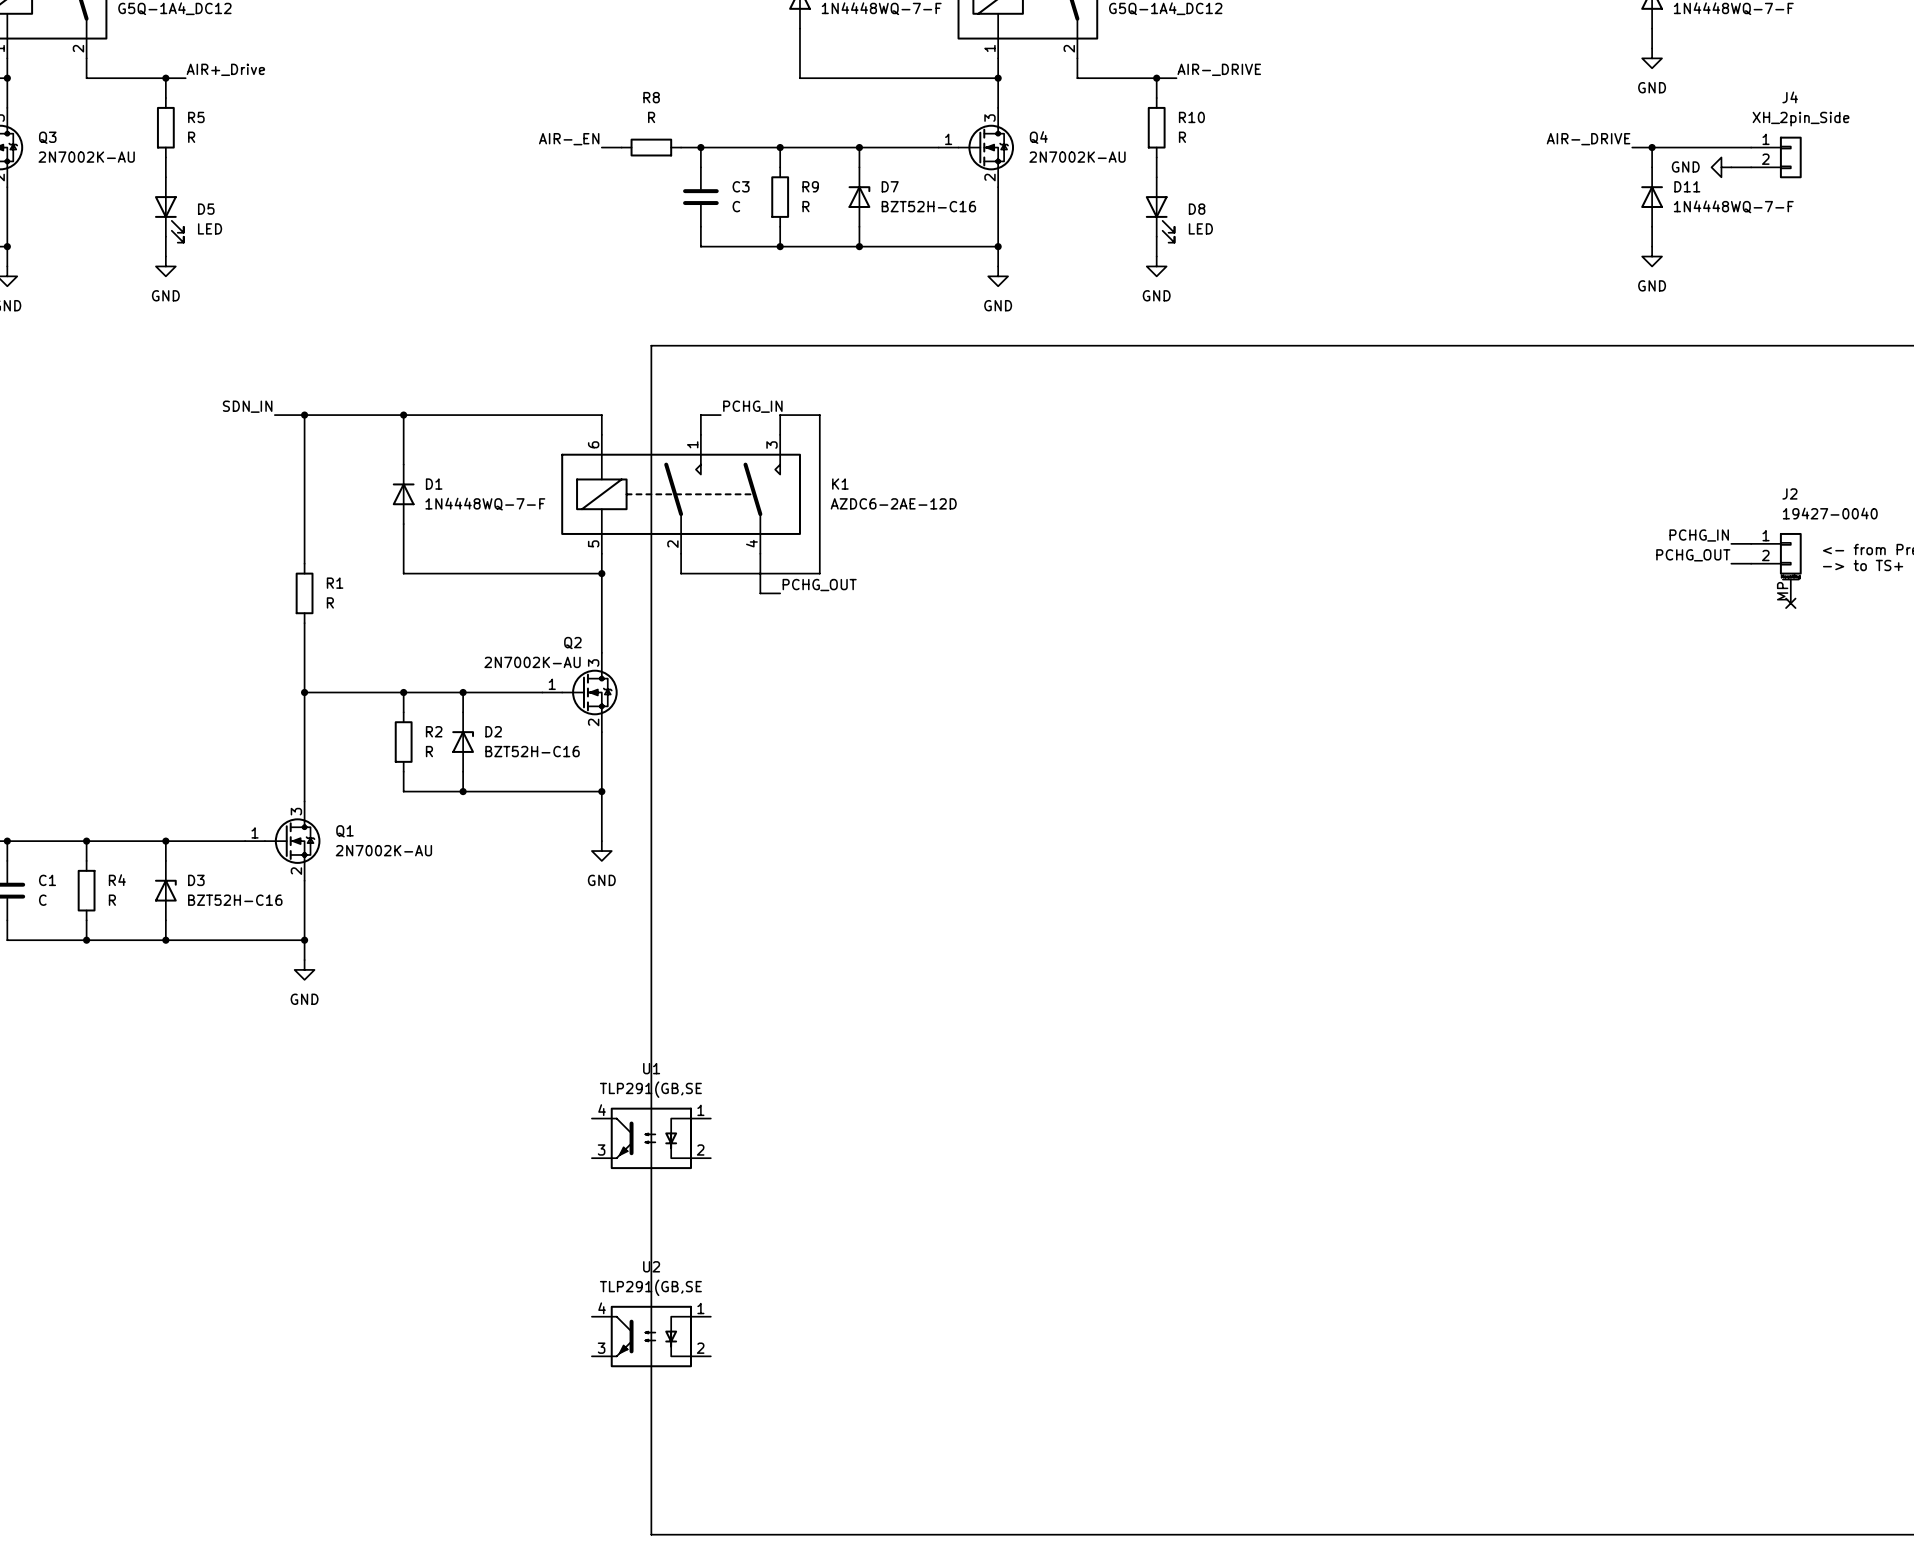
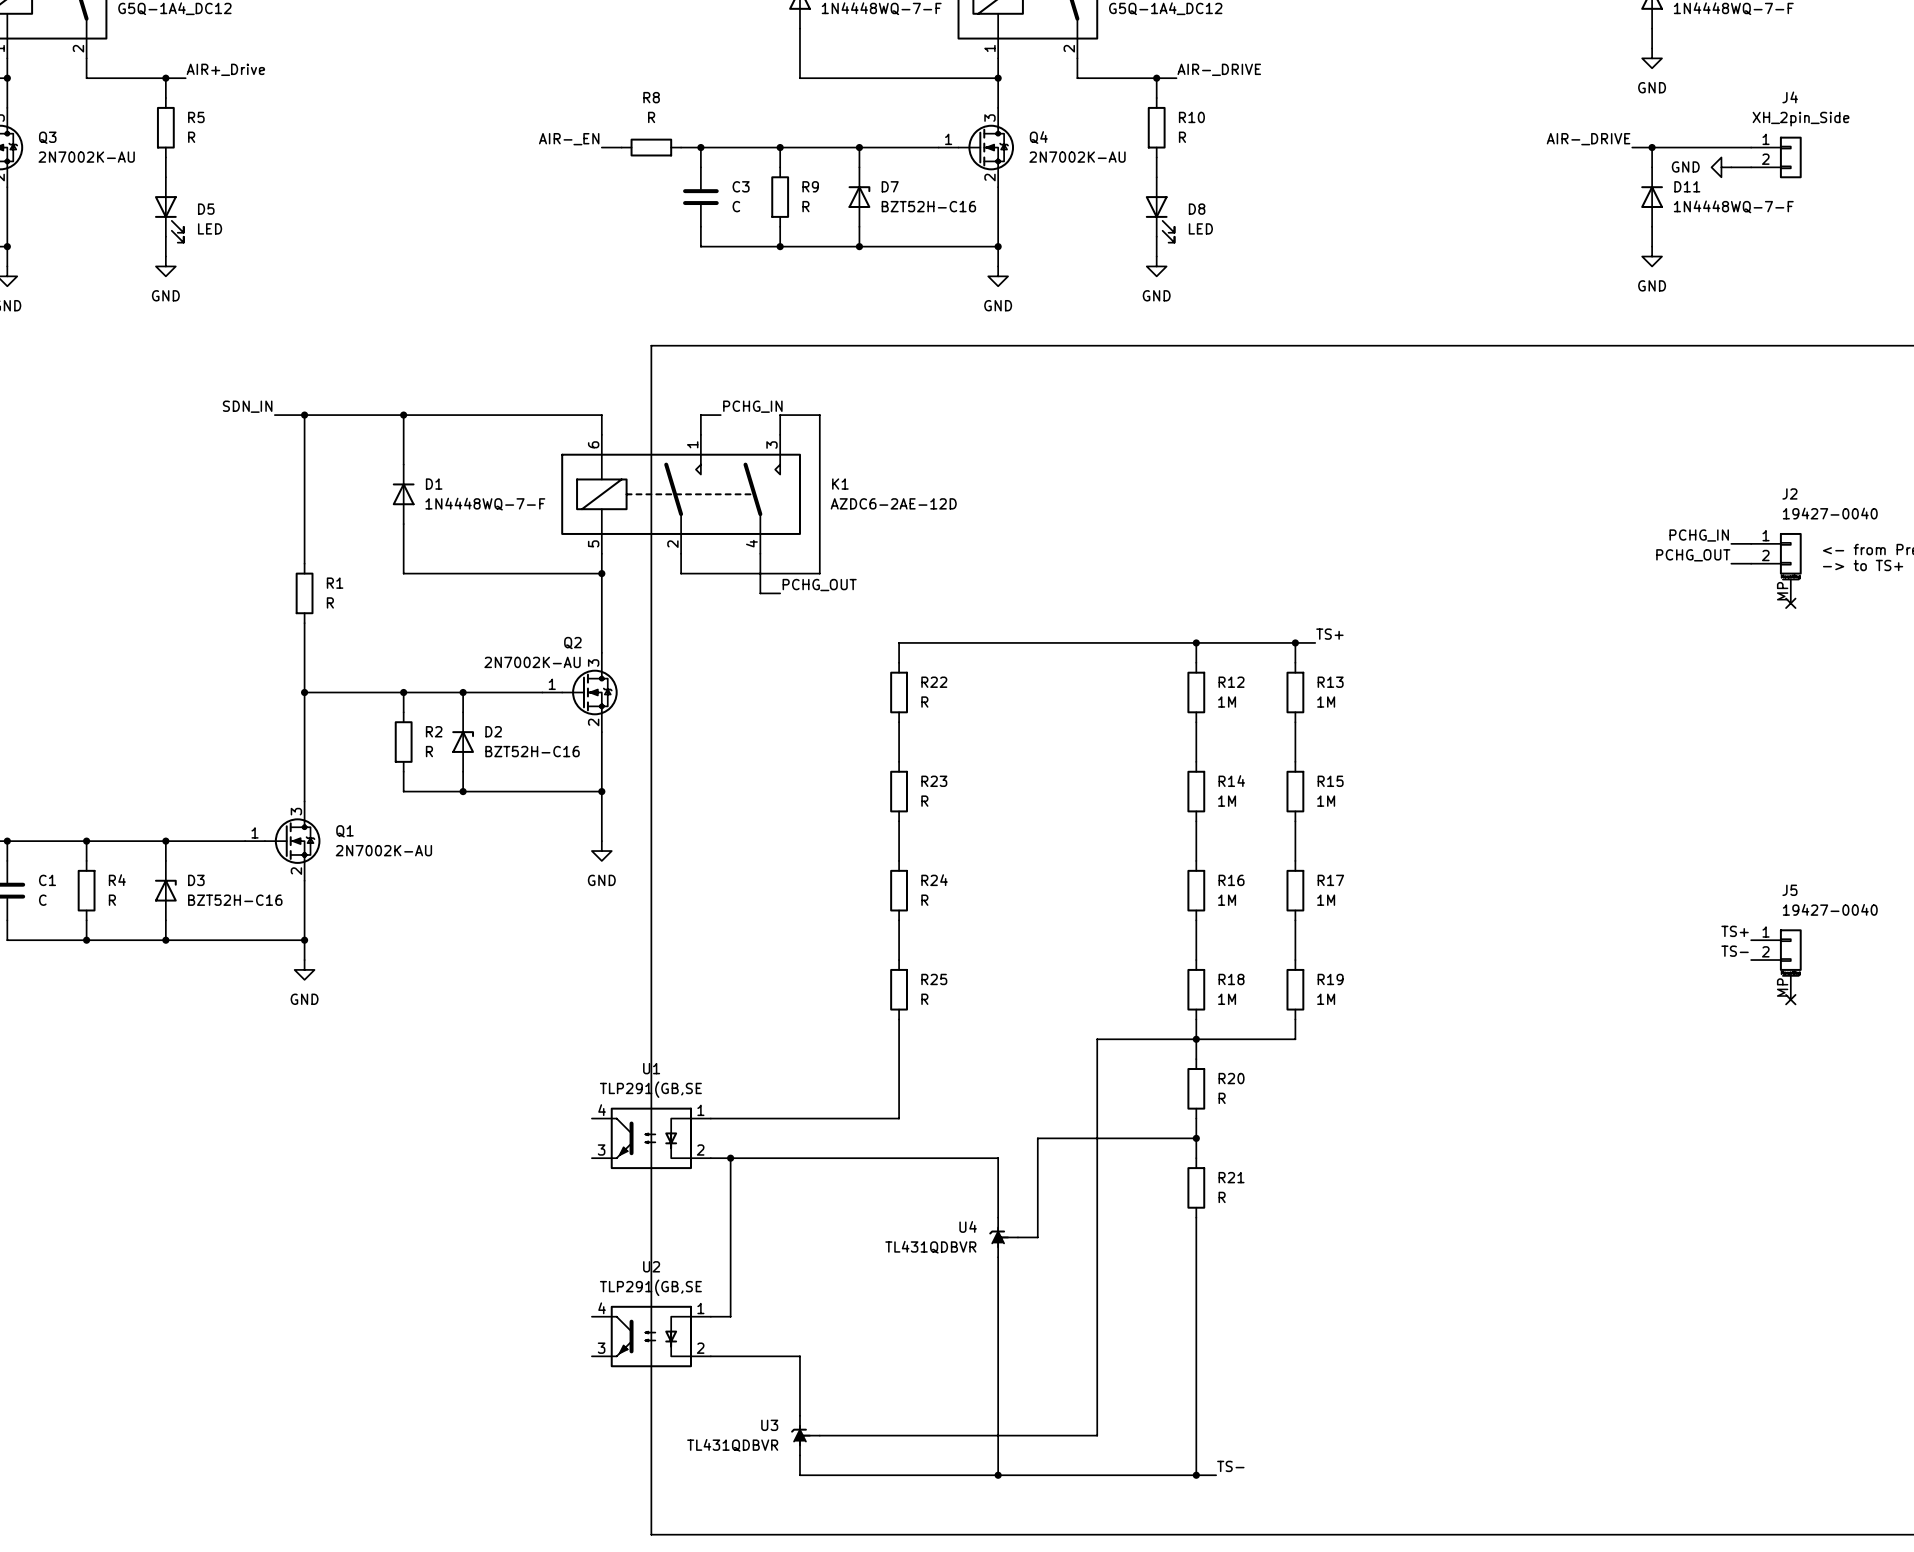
label: none -> TS+ (1329, 634)
wire: none -> (1196, 642) (1196, 662)
junction: none -> (1196, 642)
wire: none -> (1295, 642) (1295, 662)
junction: none -> (1295, 642)
wire: none -> (1315, 642) (899, 642) (899, 662)
R22: none -> R (899, 692)
R12: none -> 1M (1196, 692)
R13: none -> 1M (1295, 692)
wire: none -> (899, 722) (899, 761)
wire: none -> (1196, 722) (1196, 761)
wire: none -> (1295, 722) (1295, 761)
R23: none -> R (899, 791)
R14: none -> 1M (1196, 791)
R15: none -> 1M (1295, 791)
wire: none -> (899, 821) (899, 860)
wire: none -> (1196, 821) (1196, 860)
wire: none -> (1295, 821) (1295, 860)
R24: none -> R (899, 890)
R16: none -> 1M (1196, 890)
R17: none -> 1M (1295, 890)
wire: none -> (899, 920) (899, 960)
wire: none -> (1196, 920) (1196, 960)
wire: none -> (1295, 920) (1295, 960)
label: none -> TS+ (1735, 931)
label: none -> TS- (1735, 951)
J5: none -> 19427-0040 (1776, 964)
R25: none -> R (899, 989)
R18: none -> 1M (1196, 989)
R19: none -> 1M (1295, 989)
no-connect mark: none -> (1790, 999)
wire: none -> (899, 1019) (899, 1118) (710, 1118)
wire: none -> (1196, 1019) (1196, 1059)
wire: none -> (1295, 1019) (1295, 1039) (1097, 1039) (1097, 1435) (819, 1435)
junction: none -> (1196, 1039)
R20: none -> R (1196, 1088)
wire: none -> (1196, 1118) (1196, 1158)
wire: none -> (1196, 1138) (1037, 1138) (1037, 1237) (1017, 1237)
junction: none -> (1196, 1138)
wire: none -> (710, 1158) (998, 1158) (998, 1217)
wire: none -> (730, 1158) (730, 1316) (710, 1316)
junction: none -> (730, 1158)
R21: none -> R (1196, 1187)
wire: none -> (1196, 1217) (1196, 1475)
U4: none -> TL431QDBVR (1003, 1237)
wire: none -> (998, 1257) (998, 1475)
wire: none -> (710, 1356) (799, 1356) (799, 1415)
U3: none -> TL431QDBVR (805, 1435)
wire: none -> (799, 1455) (799, 1475) (1216, 1475)
label: none -> TS- (1230, 1466)
junction: none -> (998, 1475)
junction: none -> (1196, 1475)

